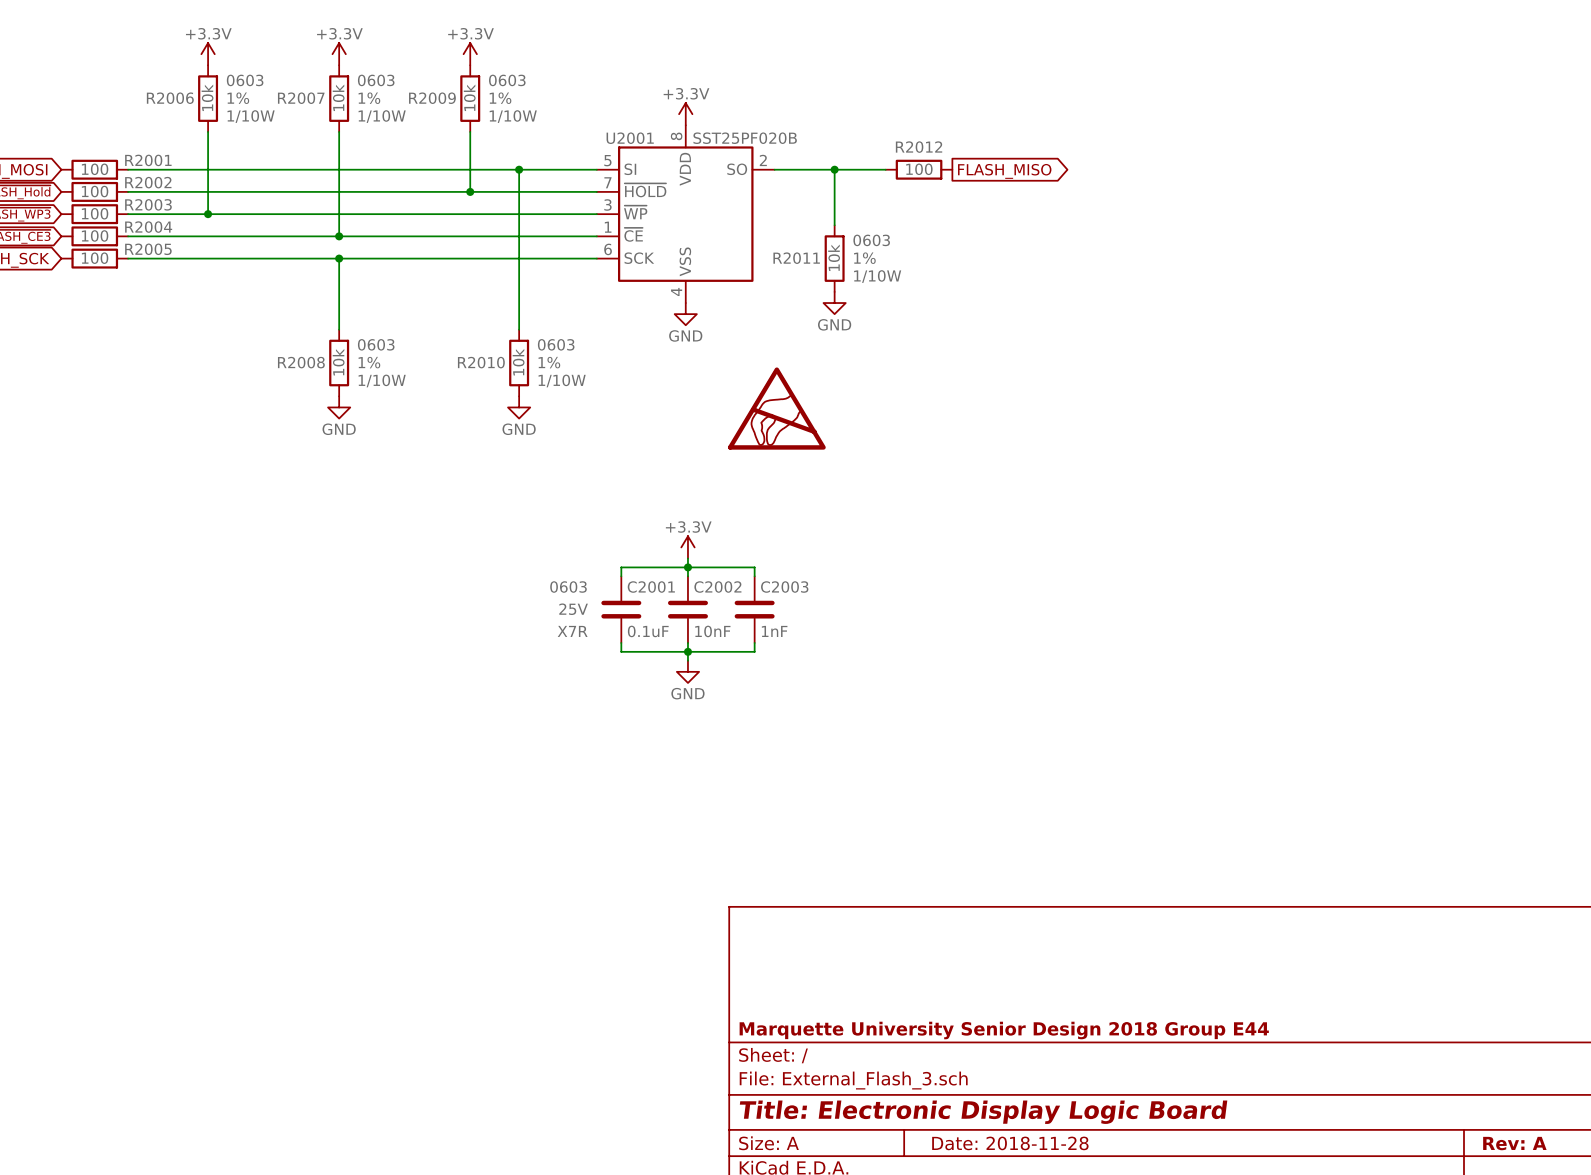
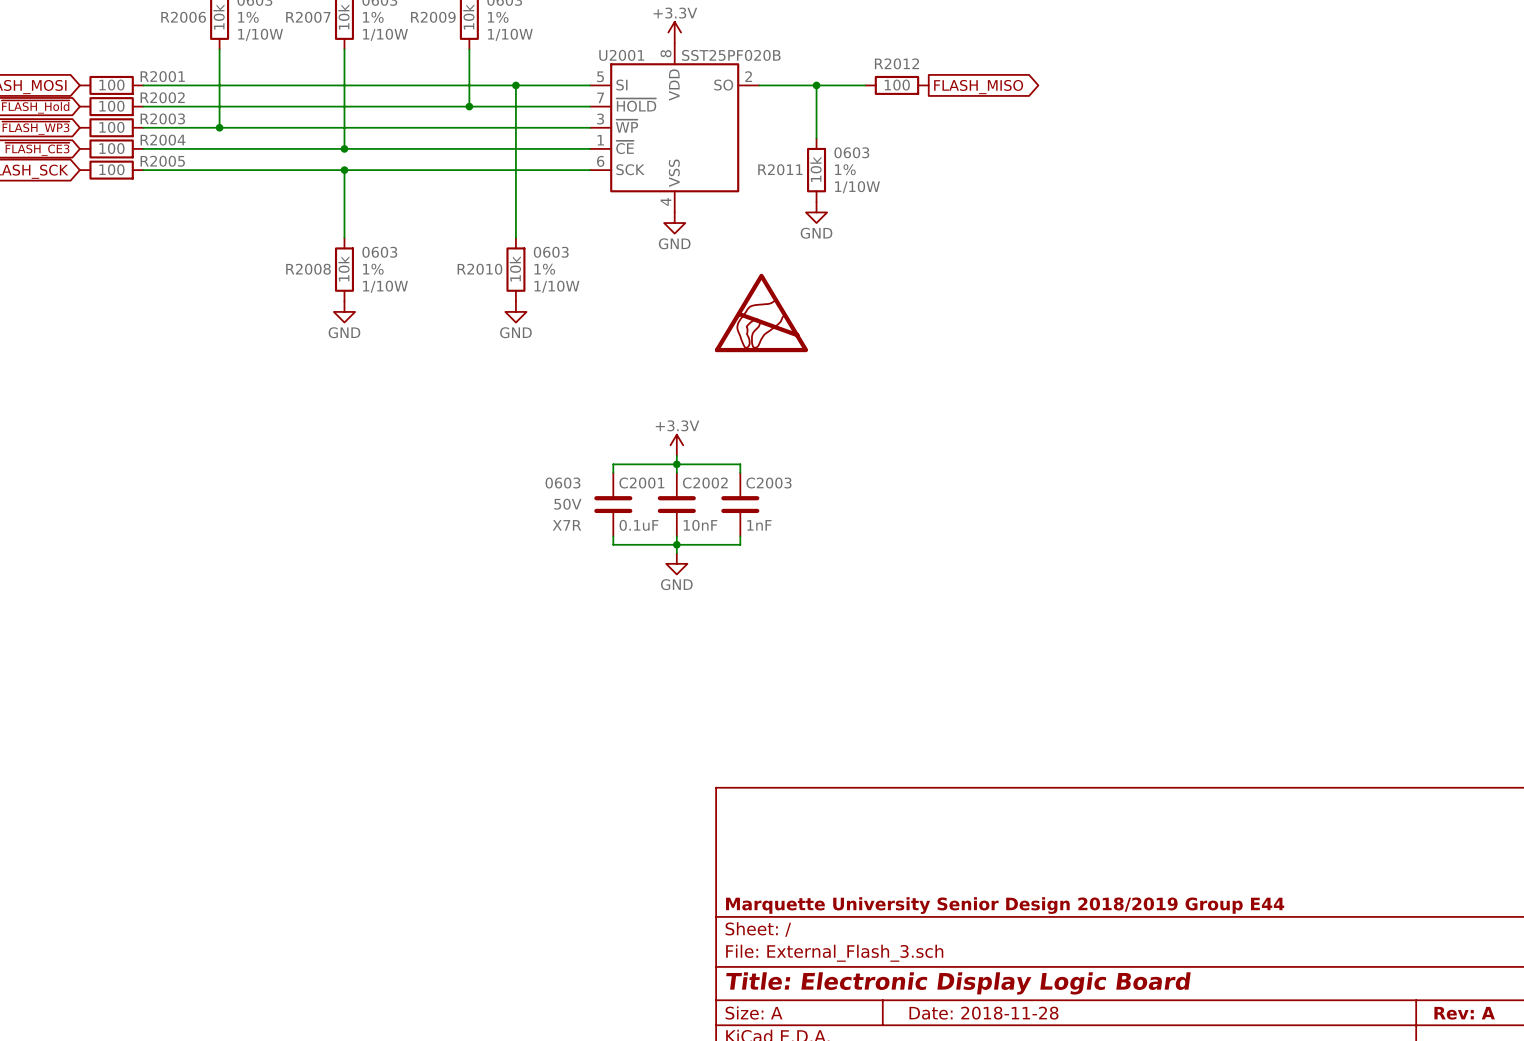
C2001 text: 25V (573, 609) -> 50V (567, 504)
title block: Marquette University Senior Design 2018 Group E44 (1004, 1030) -> Marquette University Senior Design 2018/2019 Group E44 (1005, 905)

